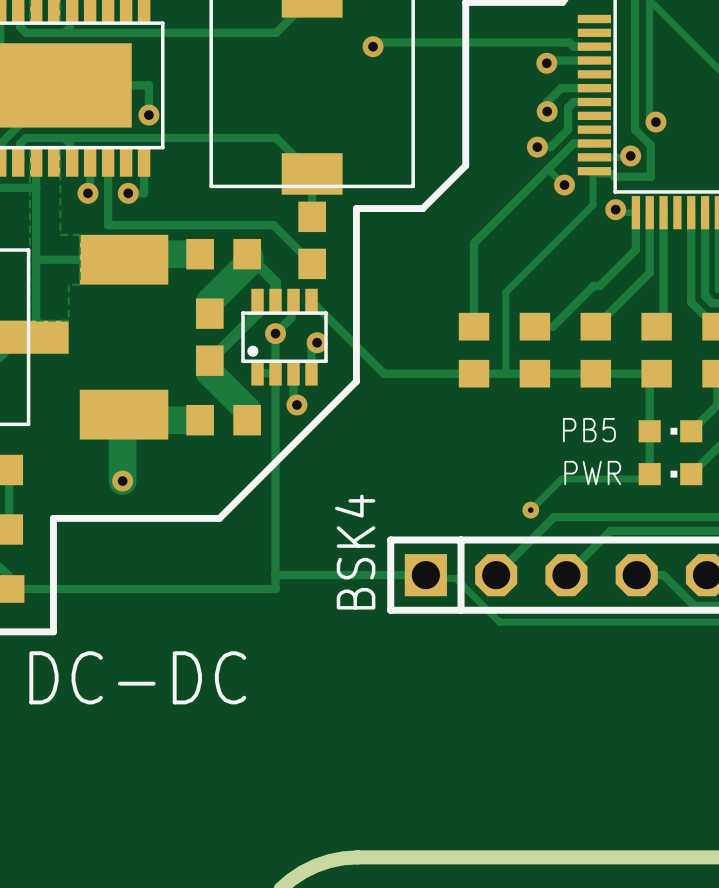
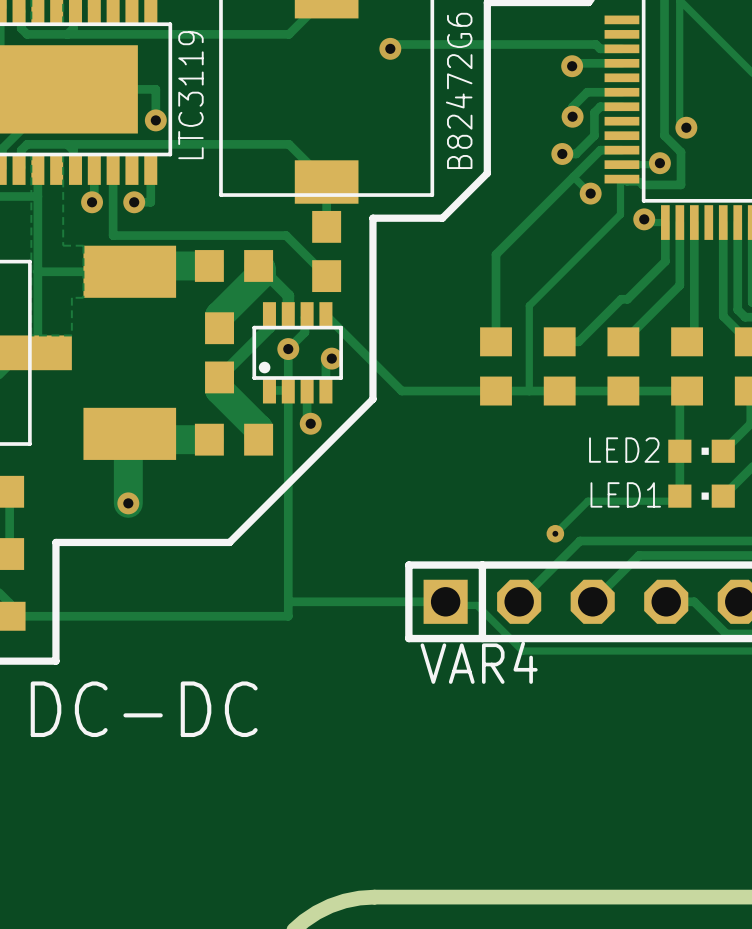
part text: none -> B82472G6 (459, 90)
part text: none -> LTC3119 (190, 95)
PB5 name: PB5 (589, 430) -> LED2 (624, 450)
PWR name: PWR (592, 473) -> LED1 (625, 494)
BSK4 name: BSK4 (355, 552) -> VAR4 (479, 662)

